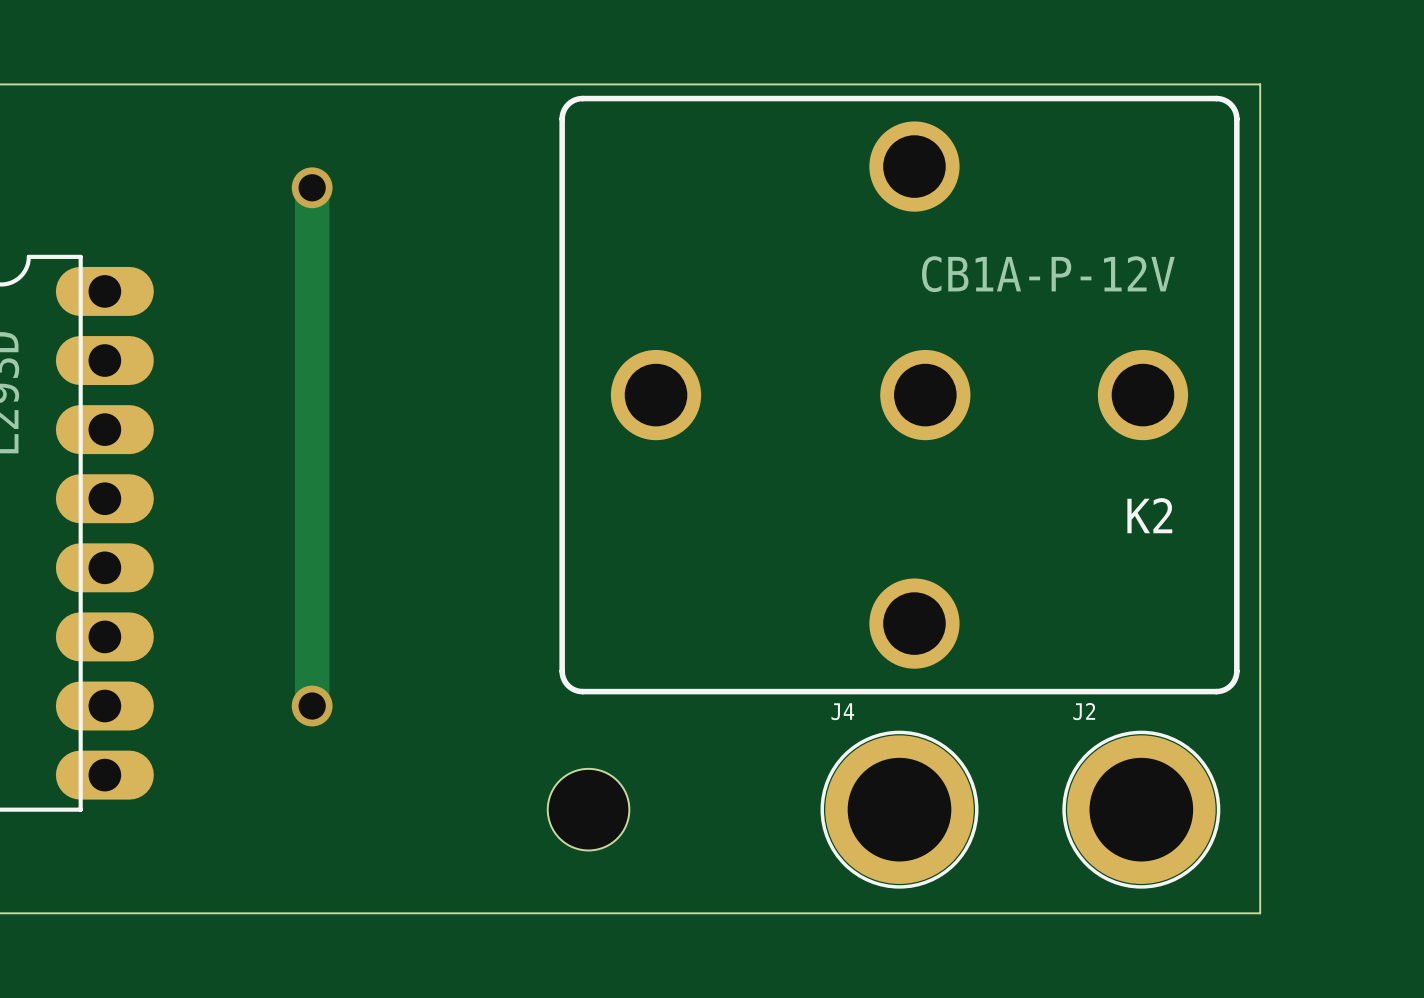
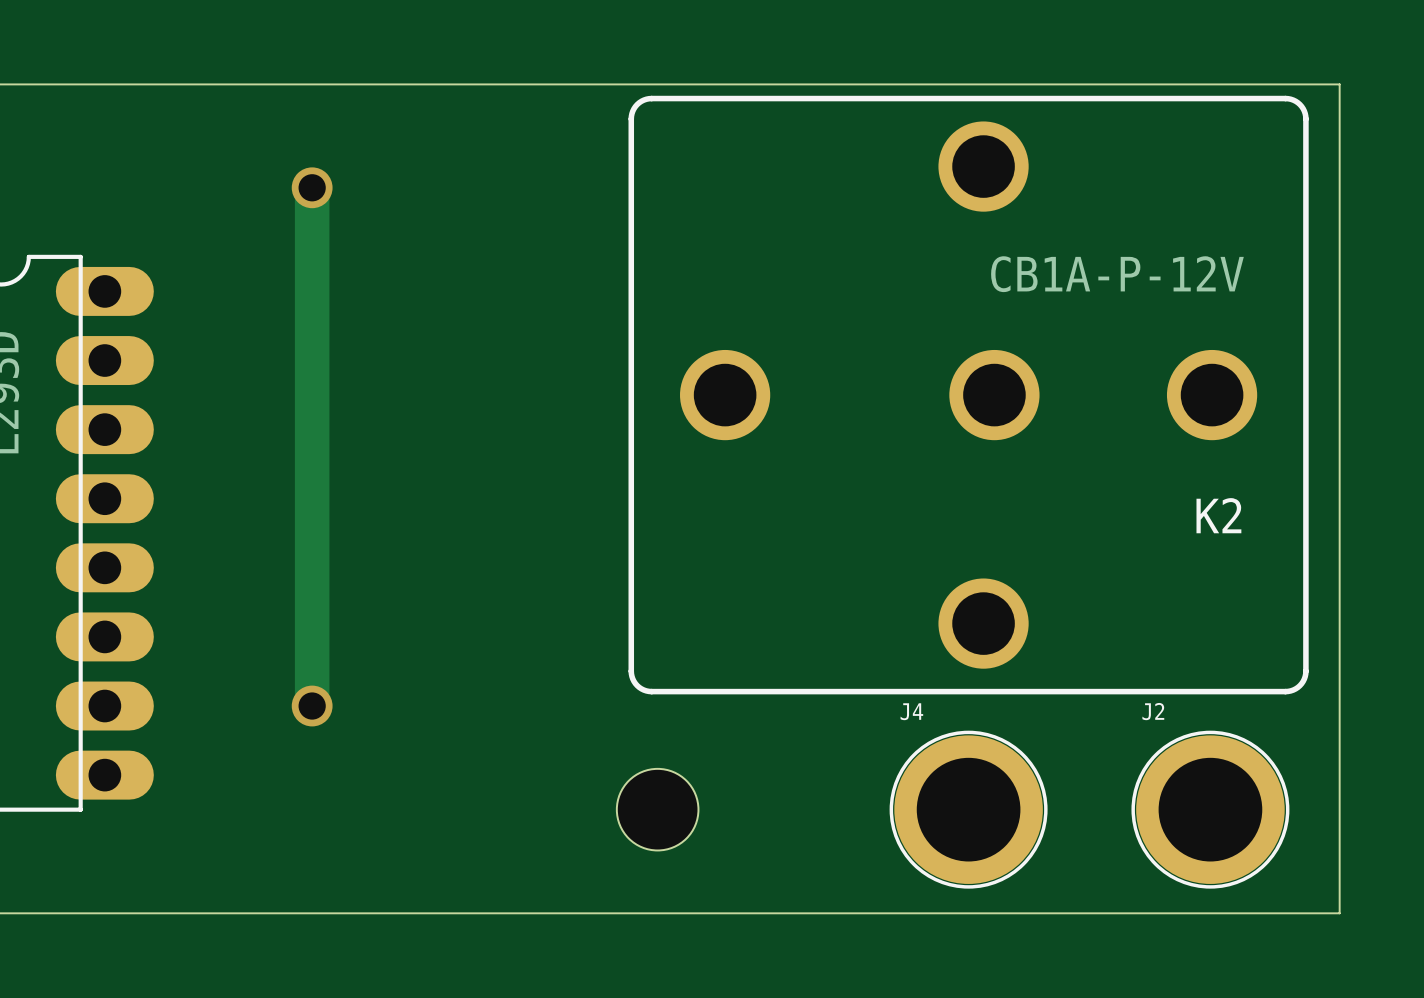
board edge: (1260, 84) (1260, 913) -> (1260, 84) (1339, 84) (1339, 913) (1260, 913)
K2 position: (899, 395) -> (968, 395)
hole position: (588, 809) -> (657, 809)
J4 position: (899, 809) -> (968, 809)
J2 position: (1141, 809) -> (1210, 809)

